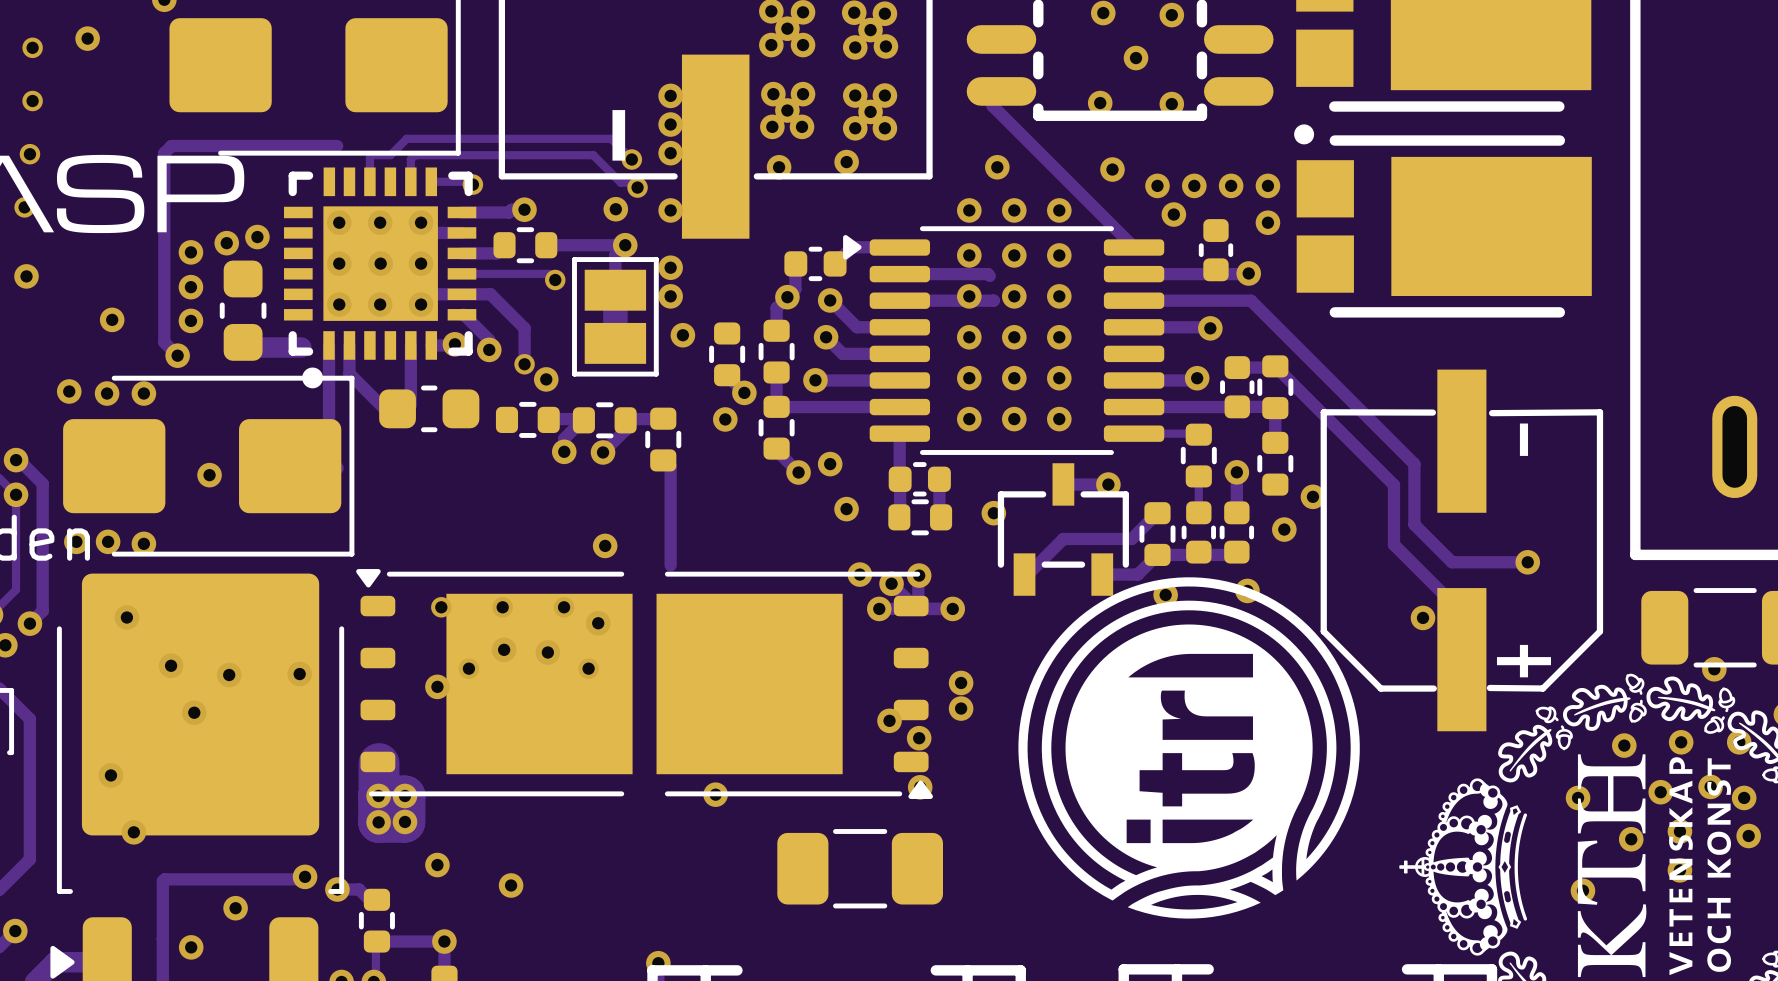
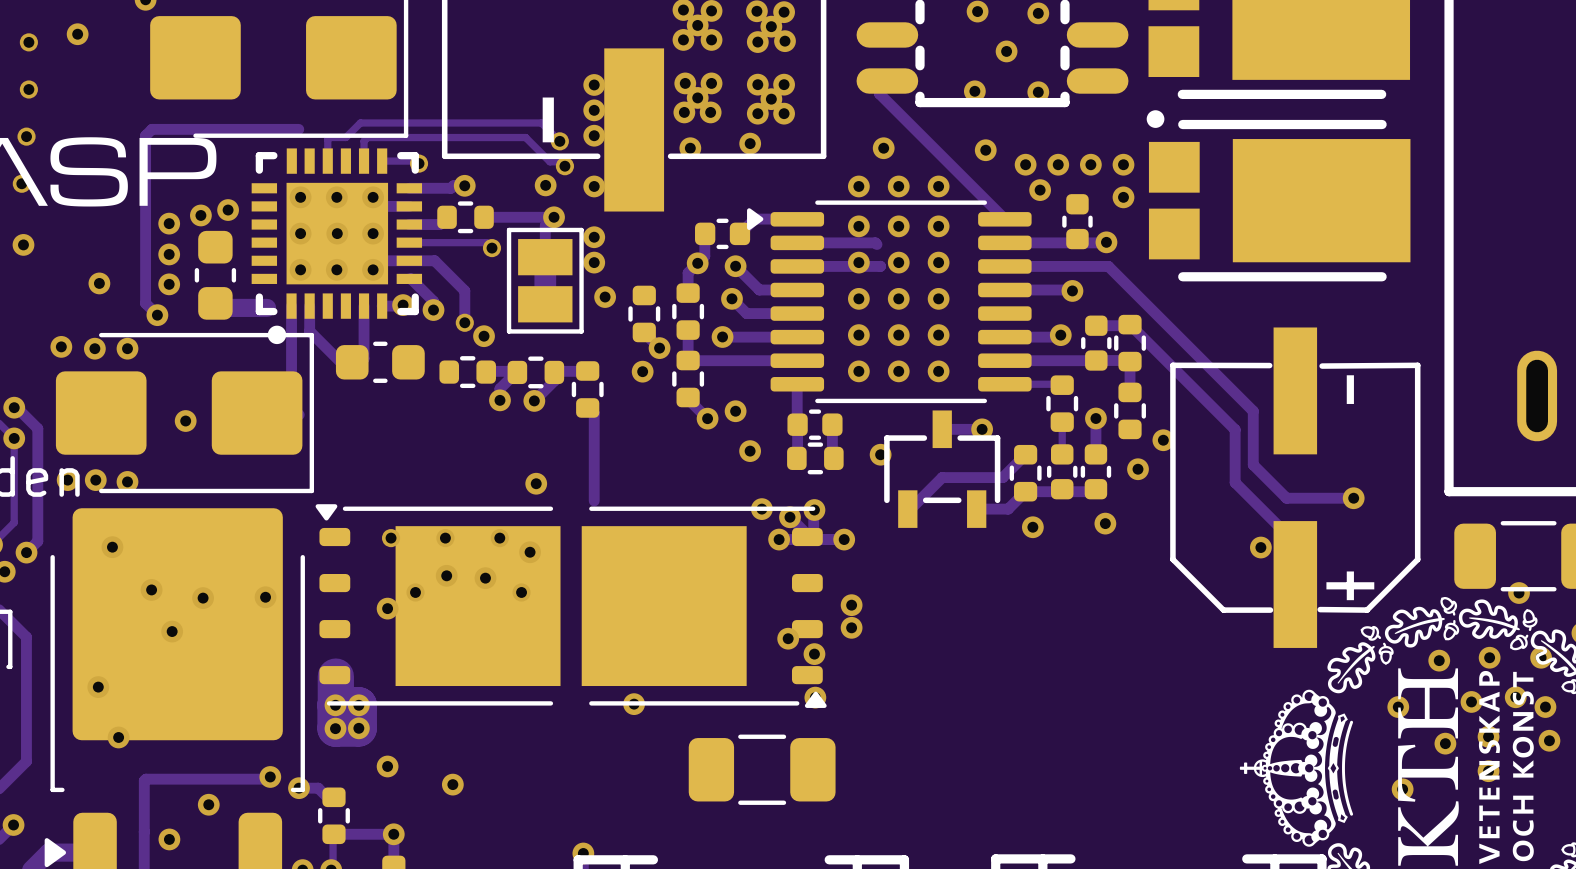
drawing: [1018, 577, 1360, 919] -> none

